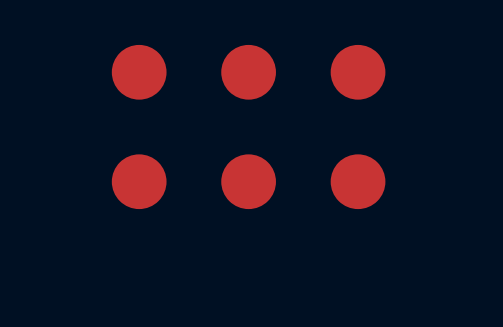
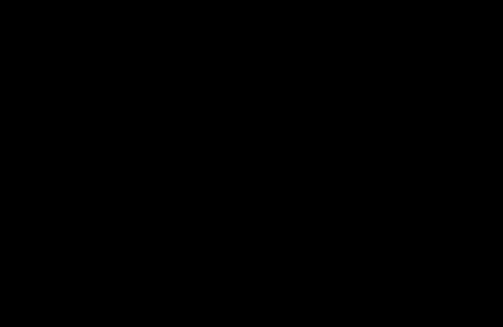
part: (139, 72) -> none
part: (248, 72) -> none
part: (358, 72) -> none
part: (139, 181) -> none
part: (248, 181) -> none
part: (358, 181) -> none

